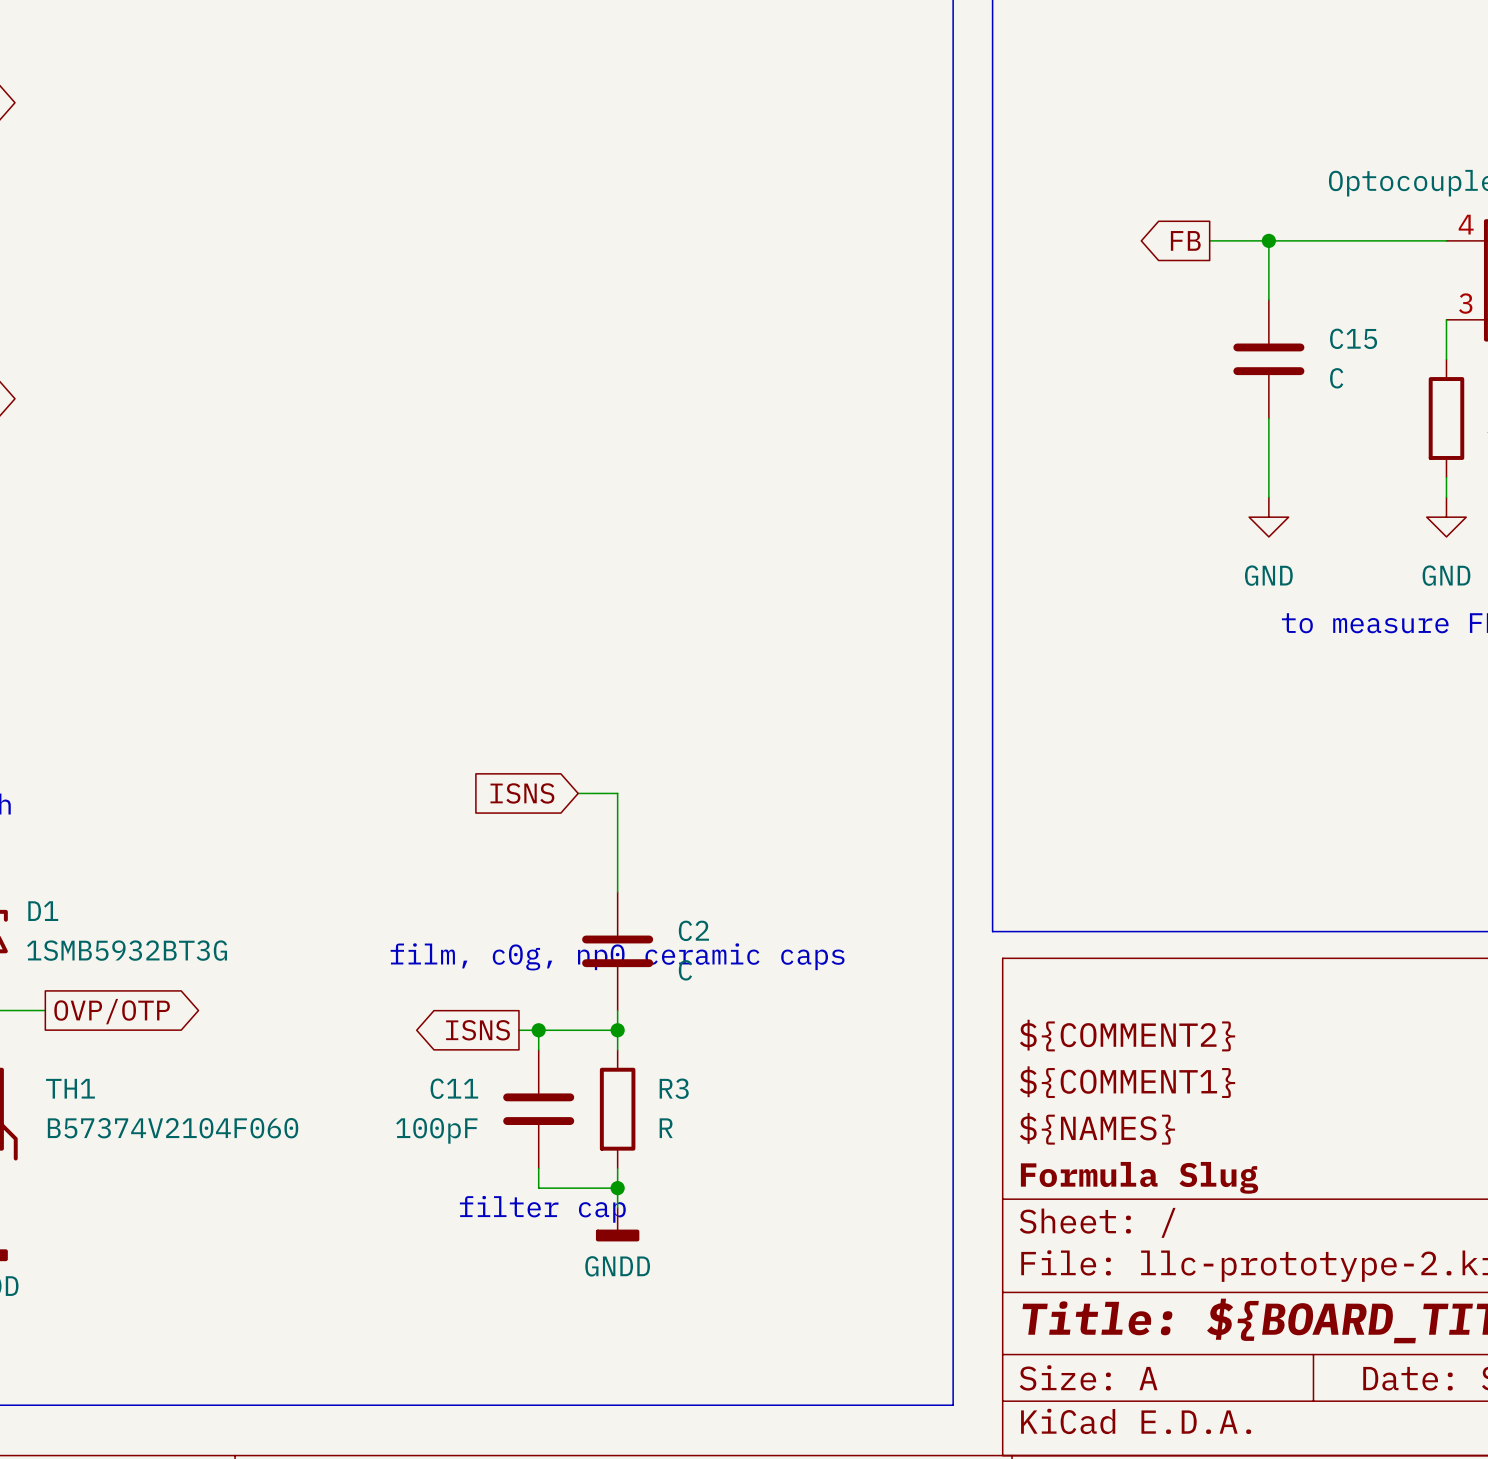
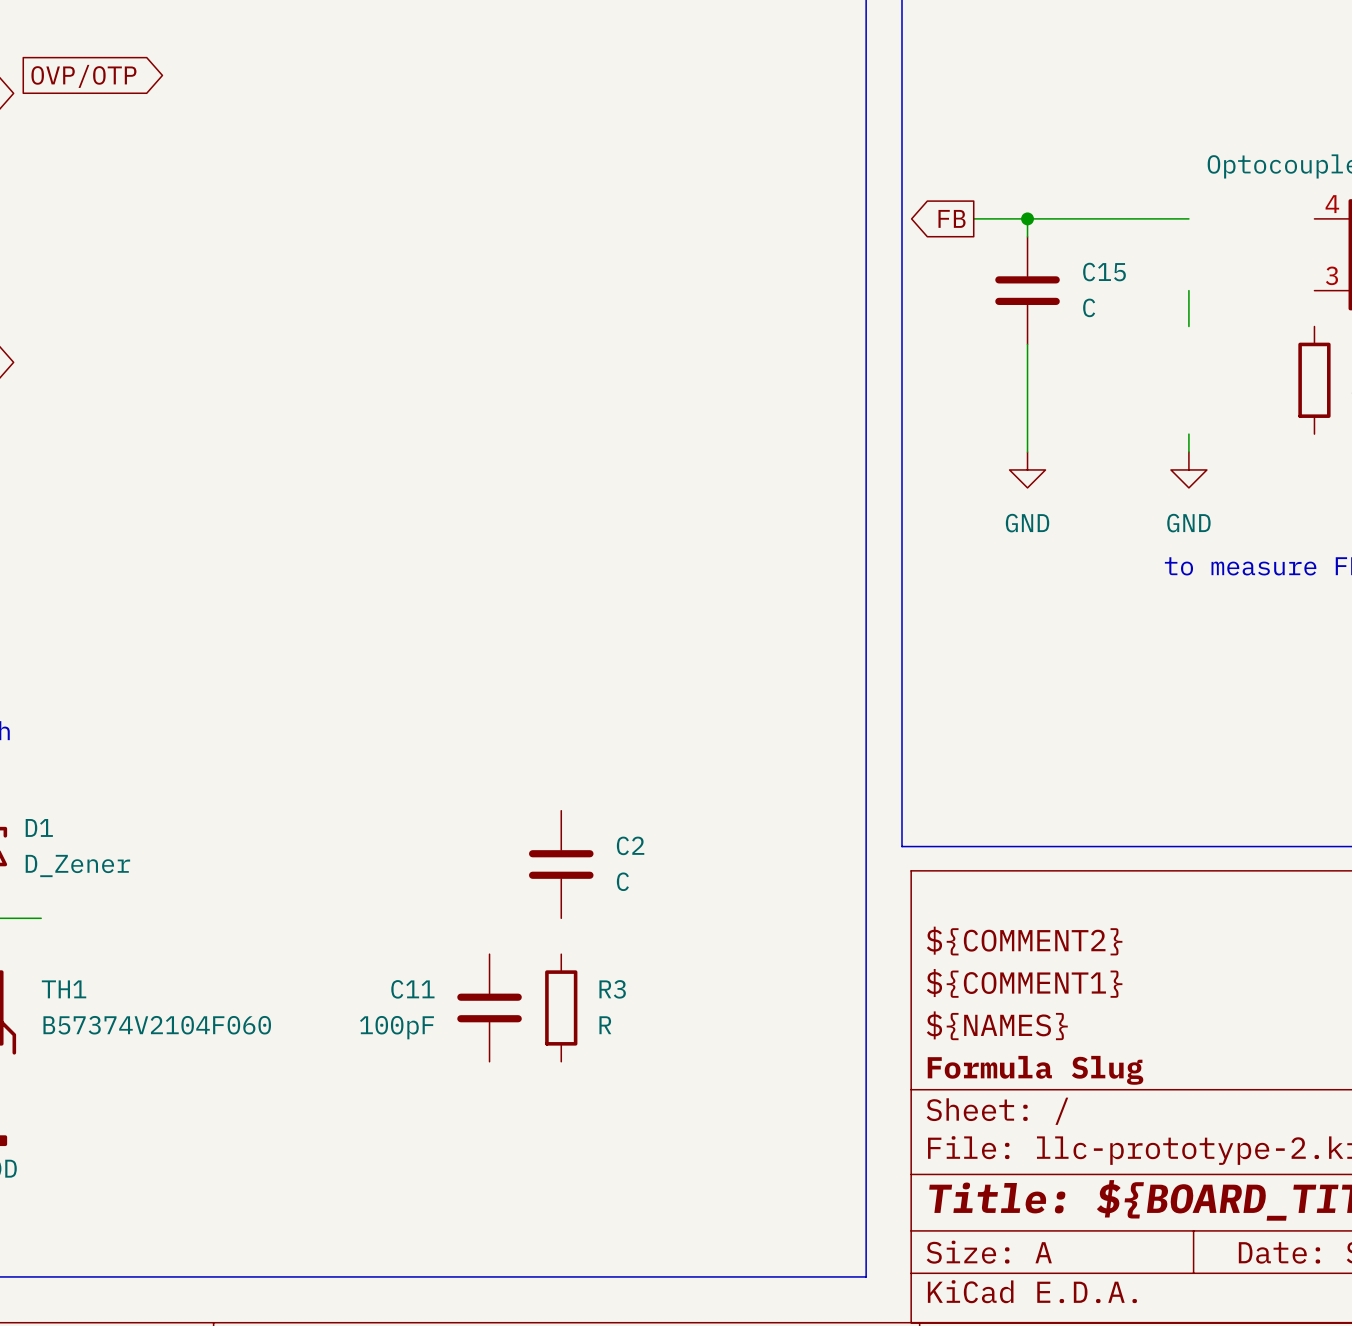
global label: none -> OVP/OTP (83, 76)
wire: none -> (1027, 218) (1027, 236)
junction: none -> (1027, 218)
global label position: FB (1185, 240) -> FB (952, 218)
wire: (1268, 240) (1268, 300) -> none
junction: (1268, 240) -> none
wire: (1308, 240) (1446, 240) -> (973, 218) (1099, 218)
wire: (1446, 319) (1446, 359) -> (1188, 290) (1188, 326)
C15 position: (1268, 359) -> (1027, 290)
wire: none -> (1027, 344) (1027, 452)
wire: (1268, 418) (1268, 497) -> none
wire: (1446, 477) (1446, 497) -> (1188, 434) (1188, 452)
power symbol: none -> GND (1027, 469)
power symbol position: GND (1268, 517) -> GND (1188, 469)
power symbol: GND (1446, 517) -> none
global label: ISNS (522, 793) -> none
wire: (578, 793) (617, 793) (617, 892) -> none
D1 value: 1SMB5932BT3G (127, 950) -> D_Zener (77, 866)
text: film, c0g, np0 ceramic caps (617, 956) -> none
wire: (617, 1010) (617, 1050) -> none
global label: OVP/OTP (112, 1011) -> none
global label: ISNS (478, 1030) -> none
wire: (518, 1030) (617, 1030) -> none
wire: (538, 1030) (538, 1050) -> none
junction: (538, 1030) -> none
junction: (617, 1030) -> none
wire: (538, 1168) (538, 1188) (617, 1188) -> none
wire: (617, 1168) (617, 1207) -> none
junction: (617, 1188) -> none
text: filter cap (542, 1209) -> none
power symbol: GNDD (617, 1224) -> none

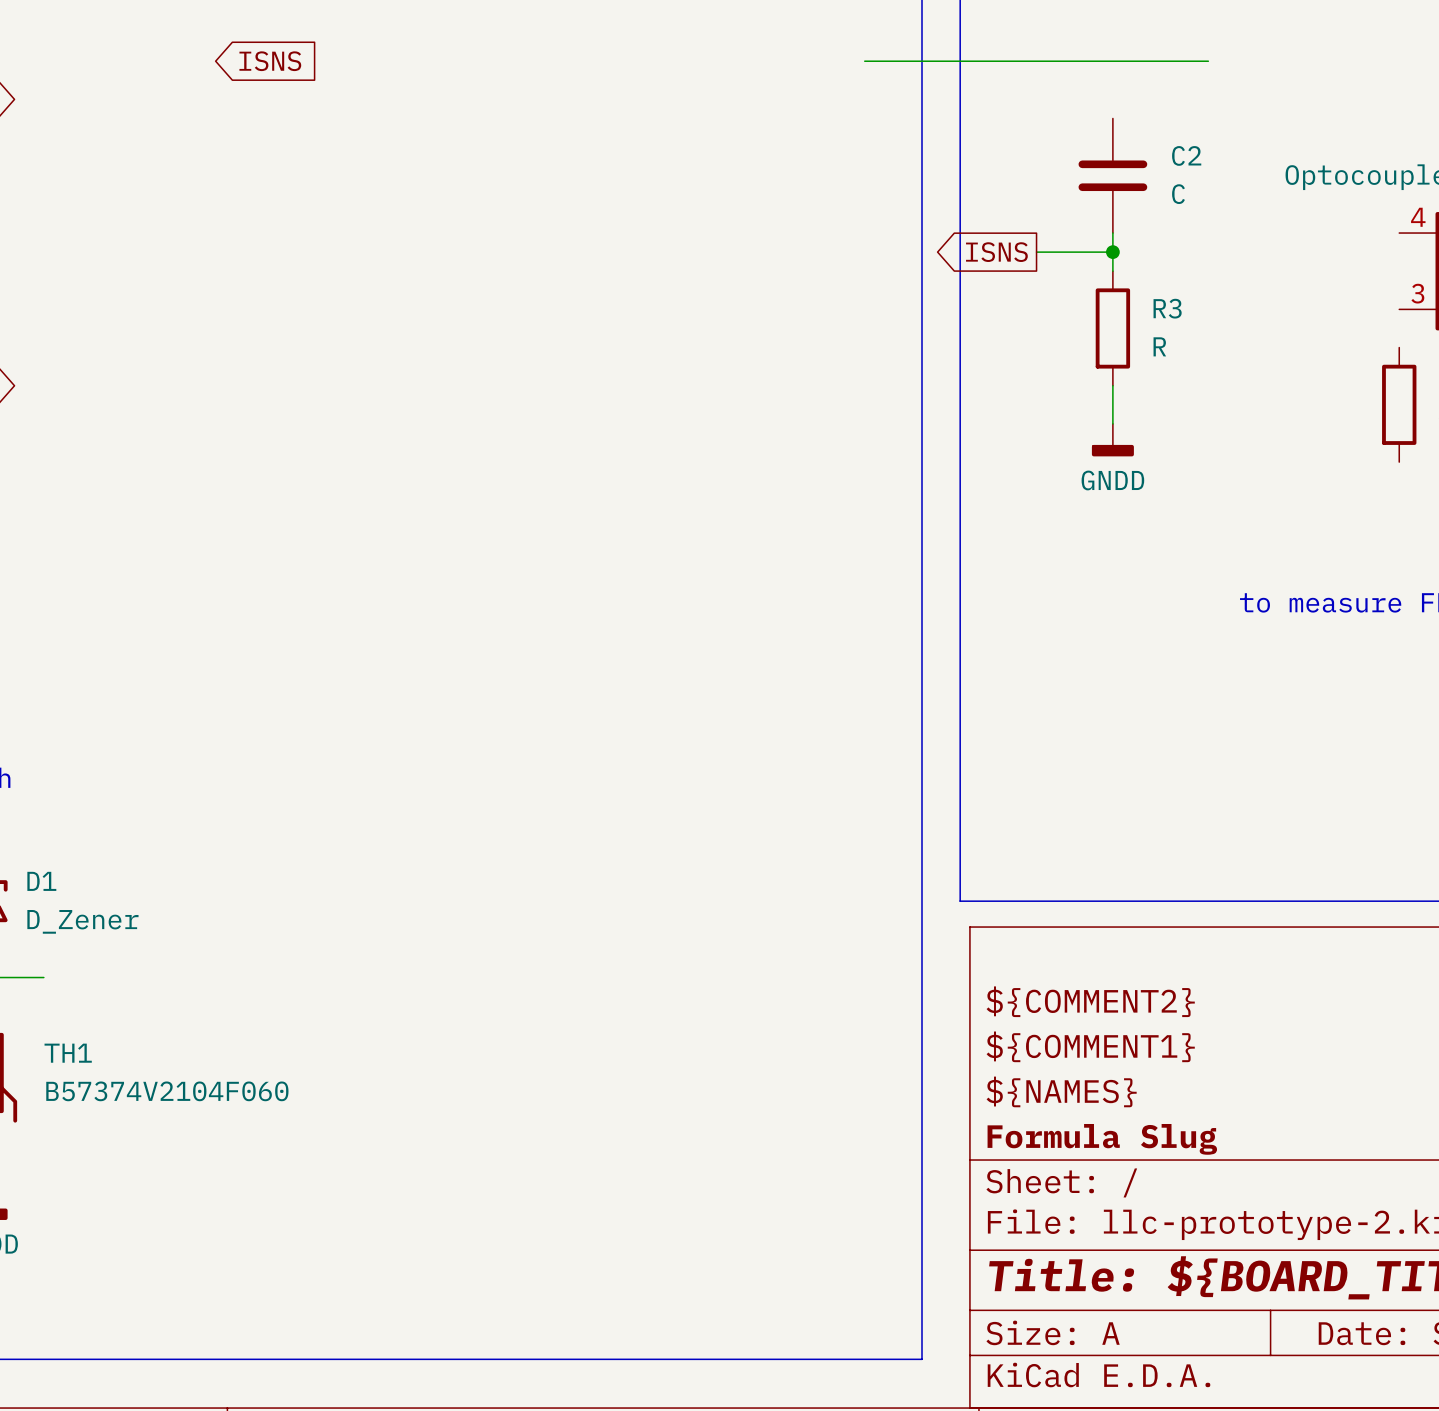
global label: none -> ISNS (270, 61)
wire: none -> (864, 61) (1208, 61)
global label: OVP/OTP (83, 76) -> none
global label: FB (952, 218) -> none
wire: (973, 218) (1188, 218) -> none
wire: (1027, 218) (1027, 236) -> none
junction position: (1027, 218) -> (1112, 252)
global label: none -> ISNS (996, 252)
wire: none -> (1036, 252) (1112, 252)
C15: C (1027, 290) -> none
wire: (1188, 290) (1188, 326) -> (1112, 233) (1112, 271)
wire: (1027, 344) (1027, 452) -> none
wire: none -> (1112, 385) (1112, 423)
power symbol: none -> GNDD (1112, 440)
wire: (1188, 434) (1188, 452) -> none
power symbol: GND (1027, 469) -> none
power symbol: GND (1188, 469) -> none
C2 position: (561, 864) -> (1112, 175)
C11: 100pF (489, 1007) -> none
R3 position: (561, 1007) -> (1112, 328)

